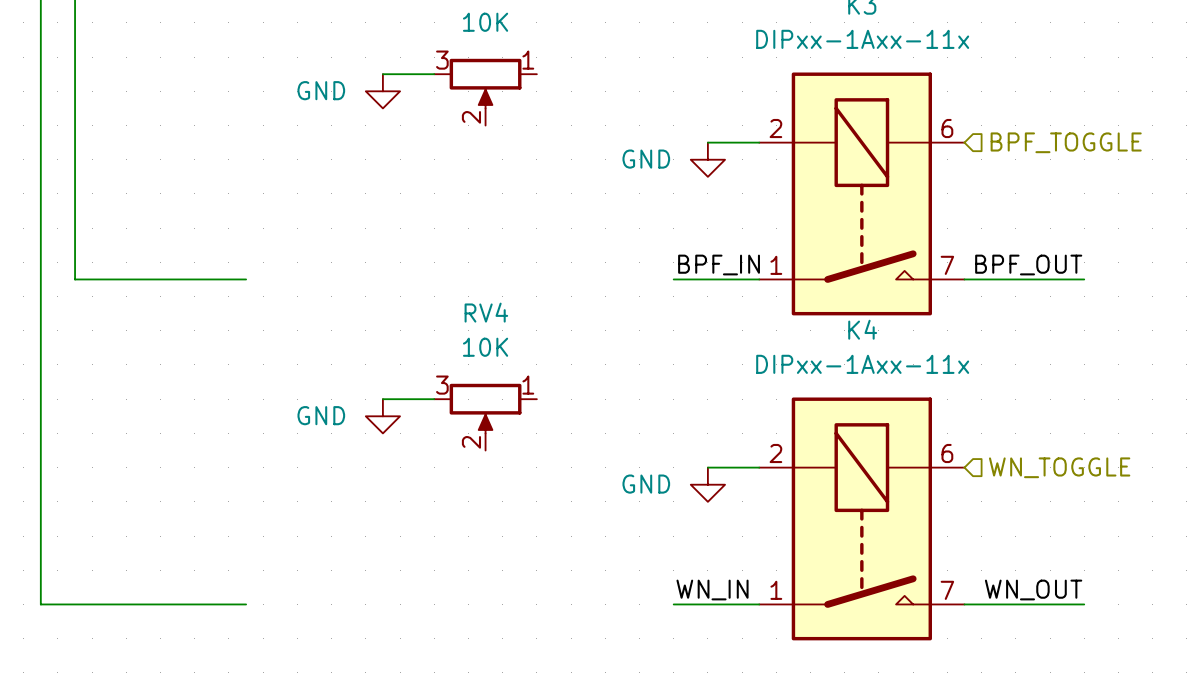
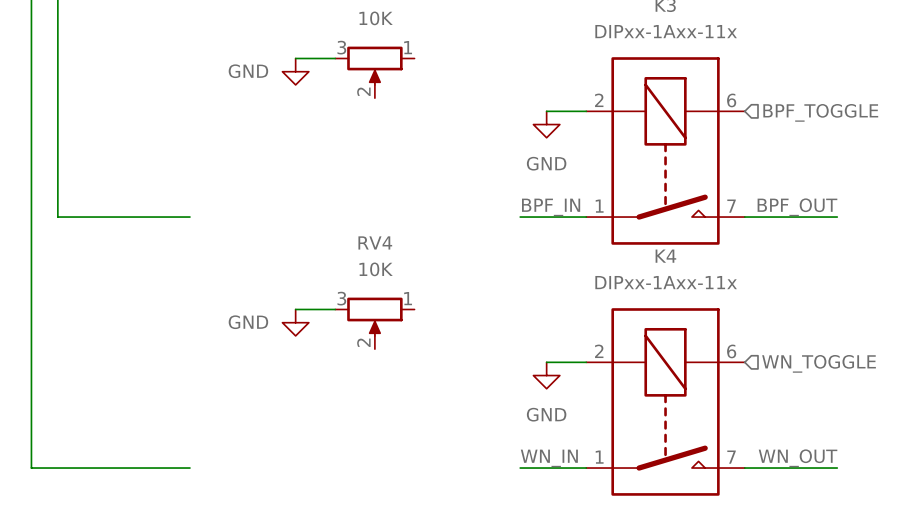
power symbol text position: GND (646, 159) -> GND (546, 163)
power symbol text position: GND (646, 484) -> GND (546, 414)

